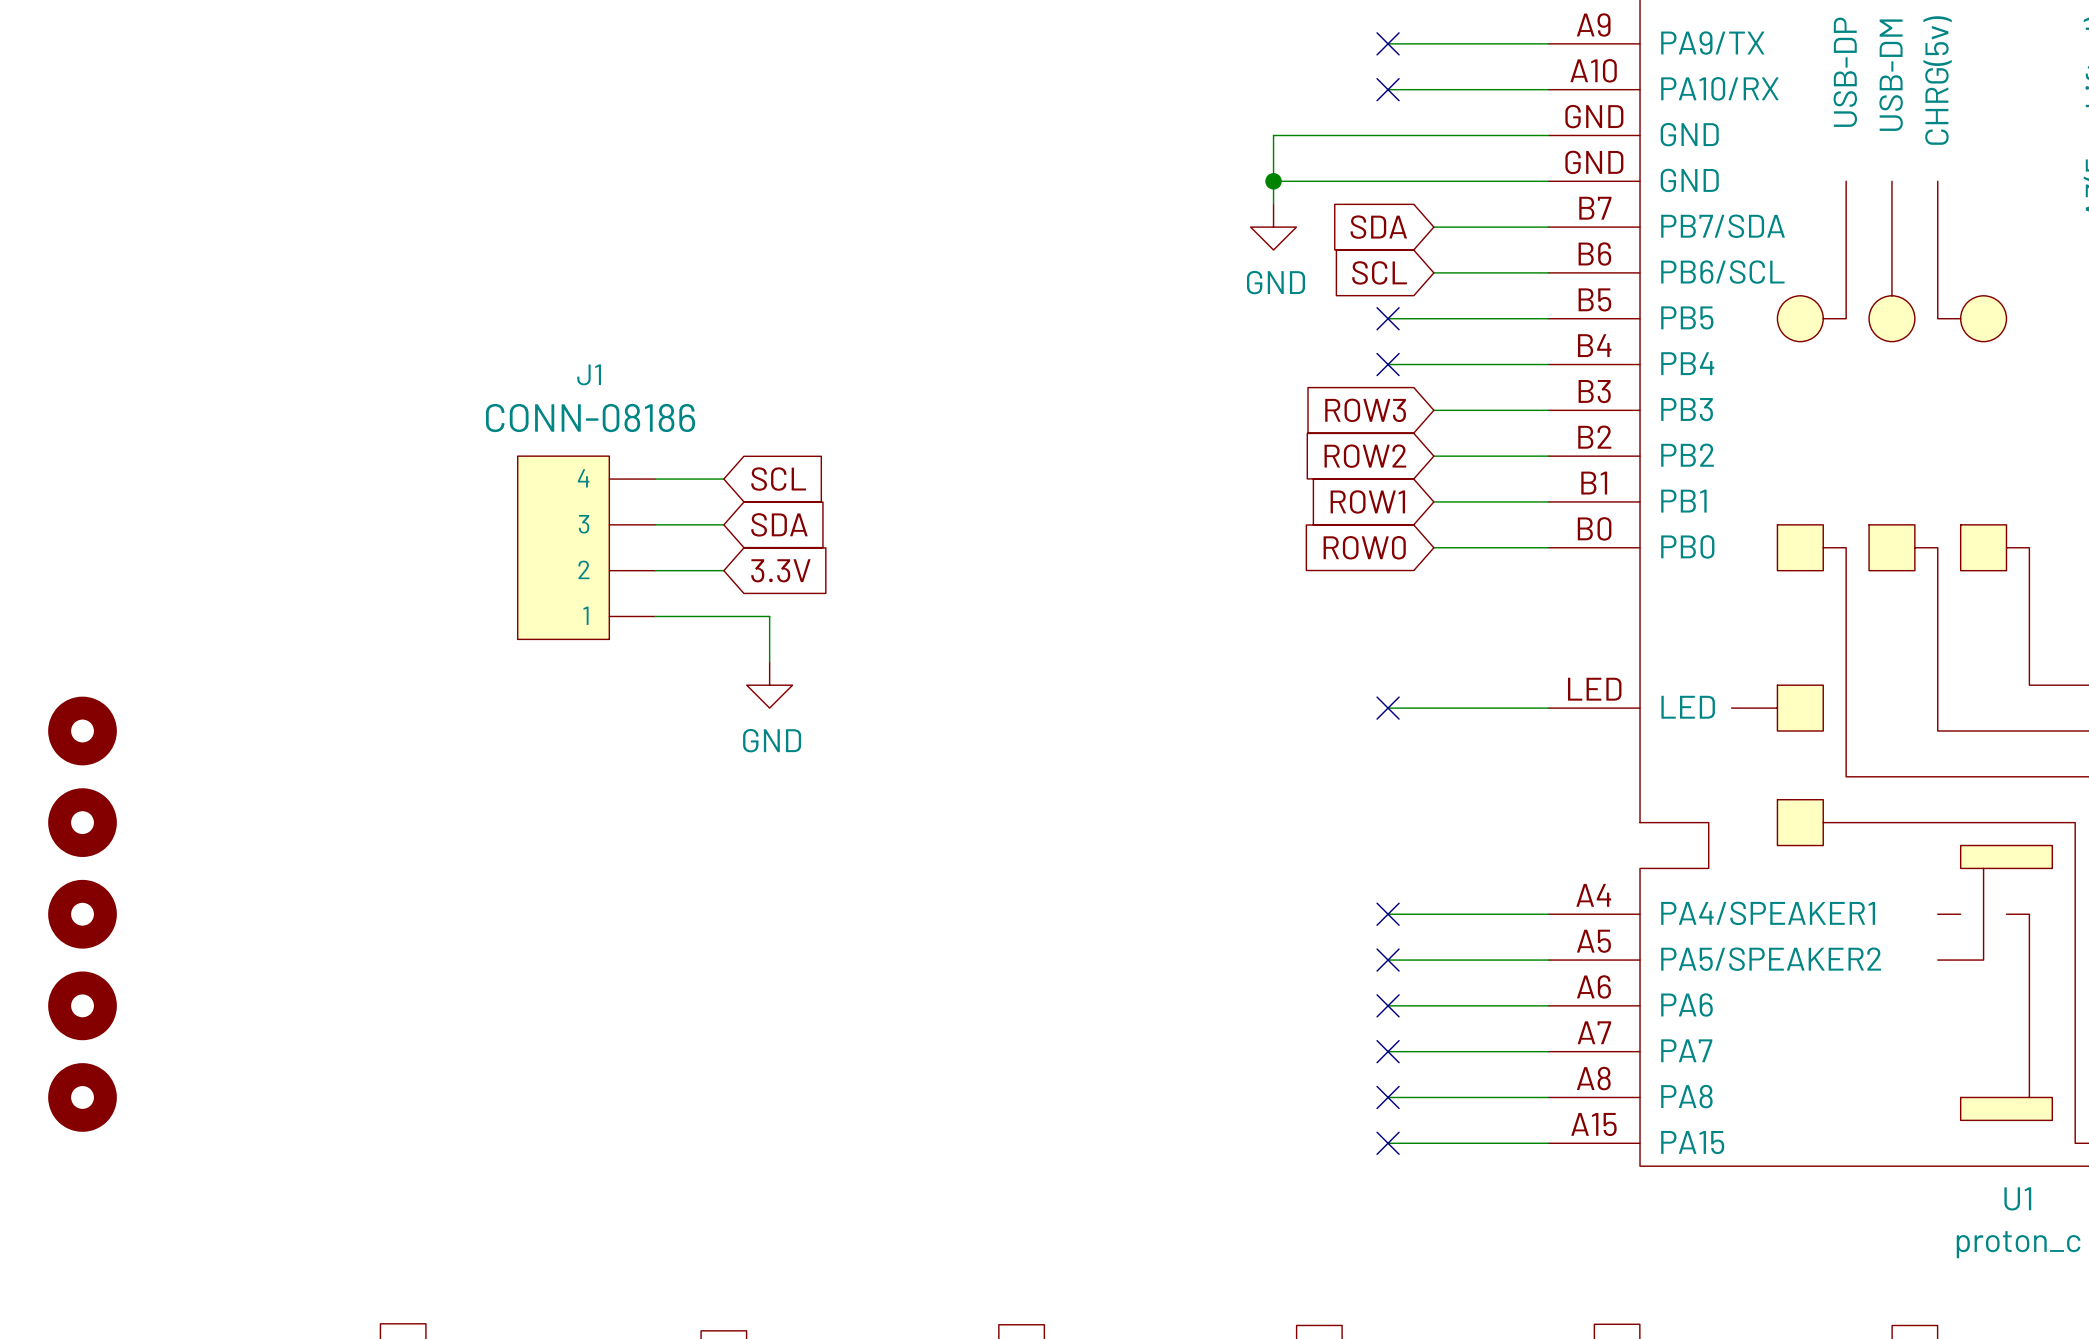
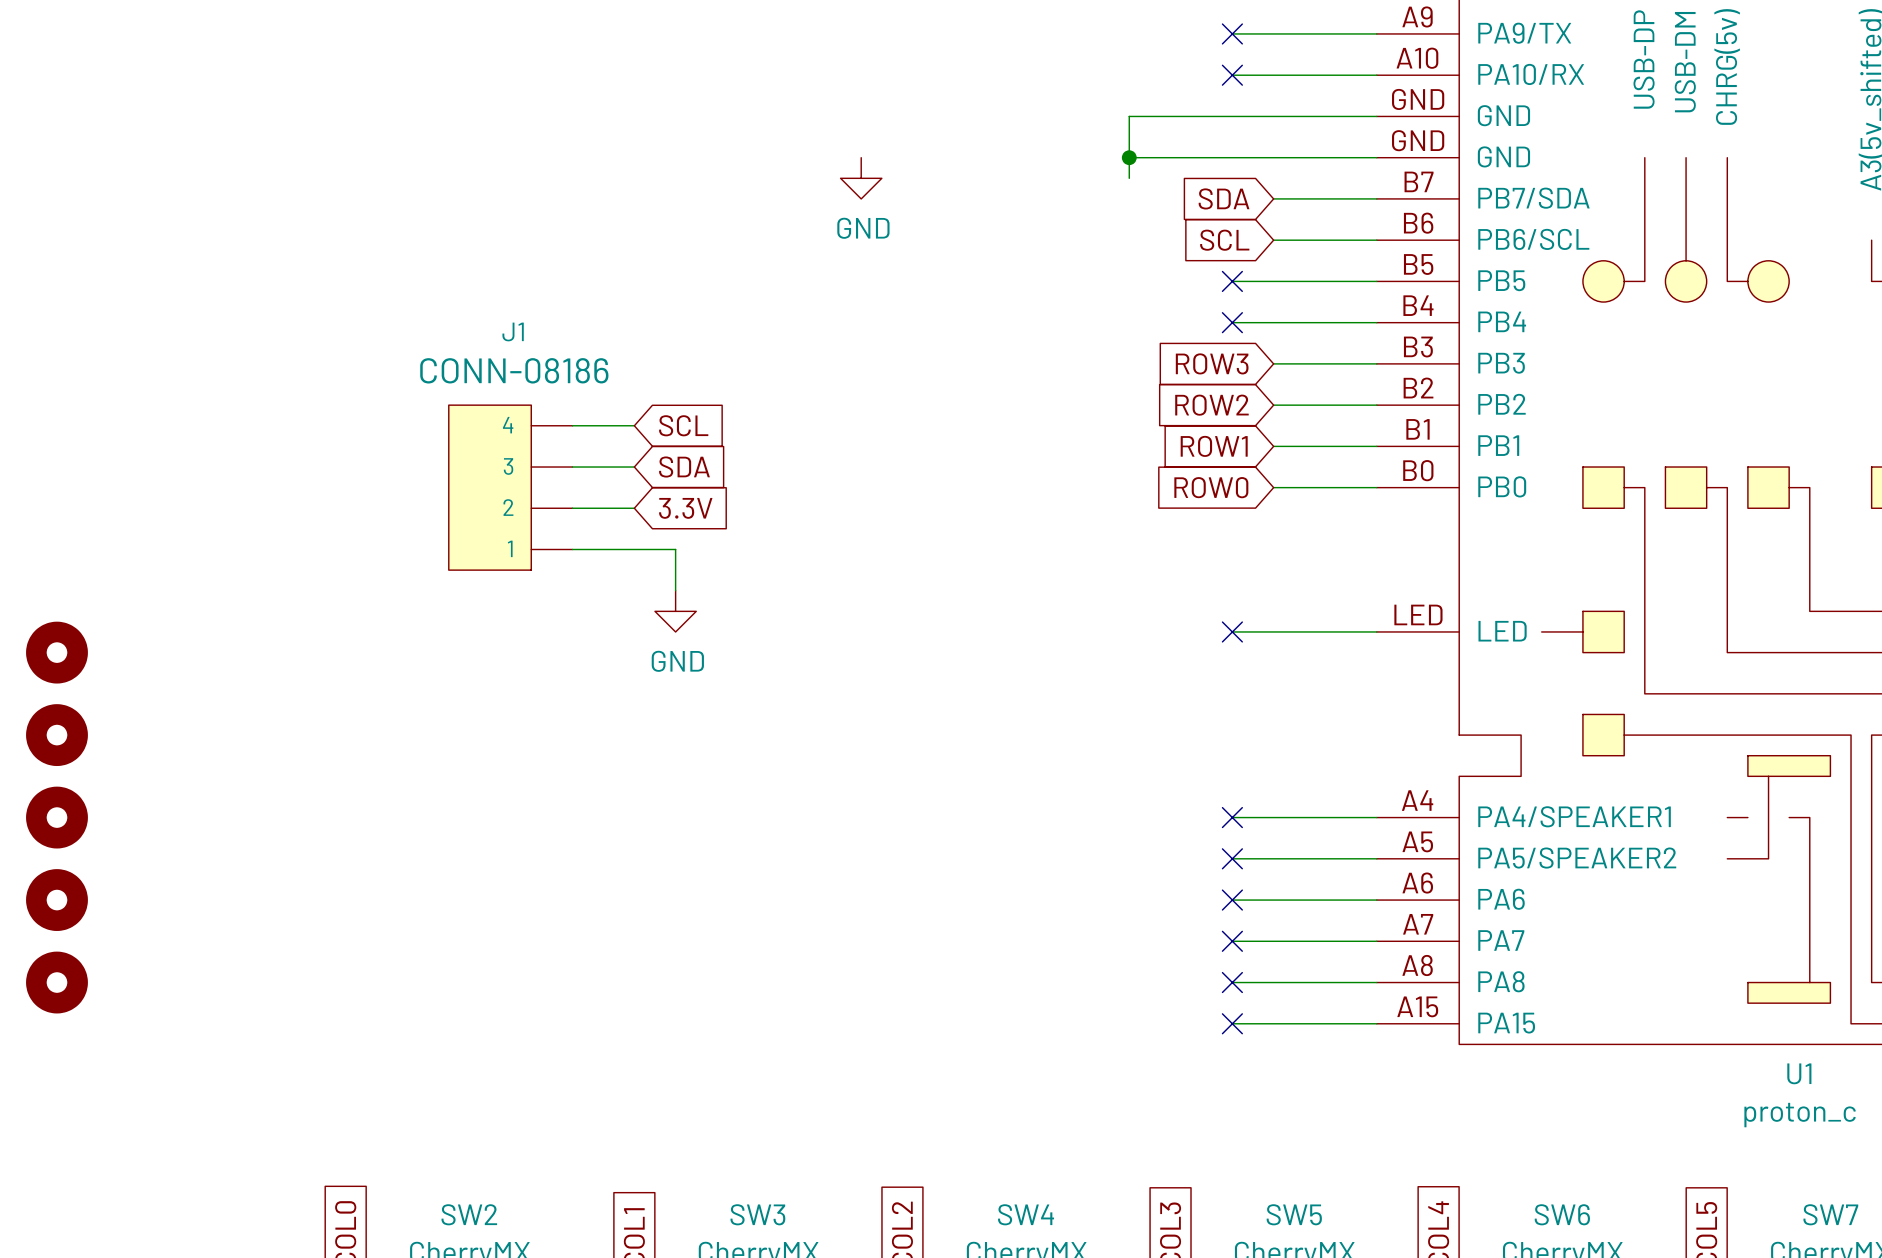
power symbol position: GND (1273, 227) -> GND (861, 178)

